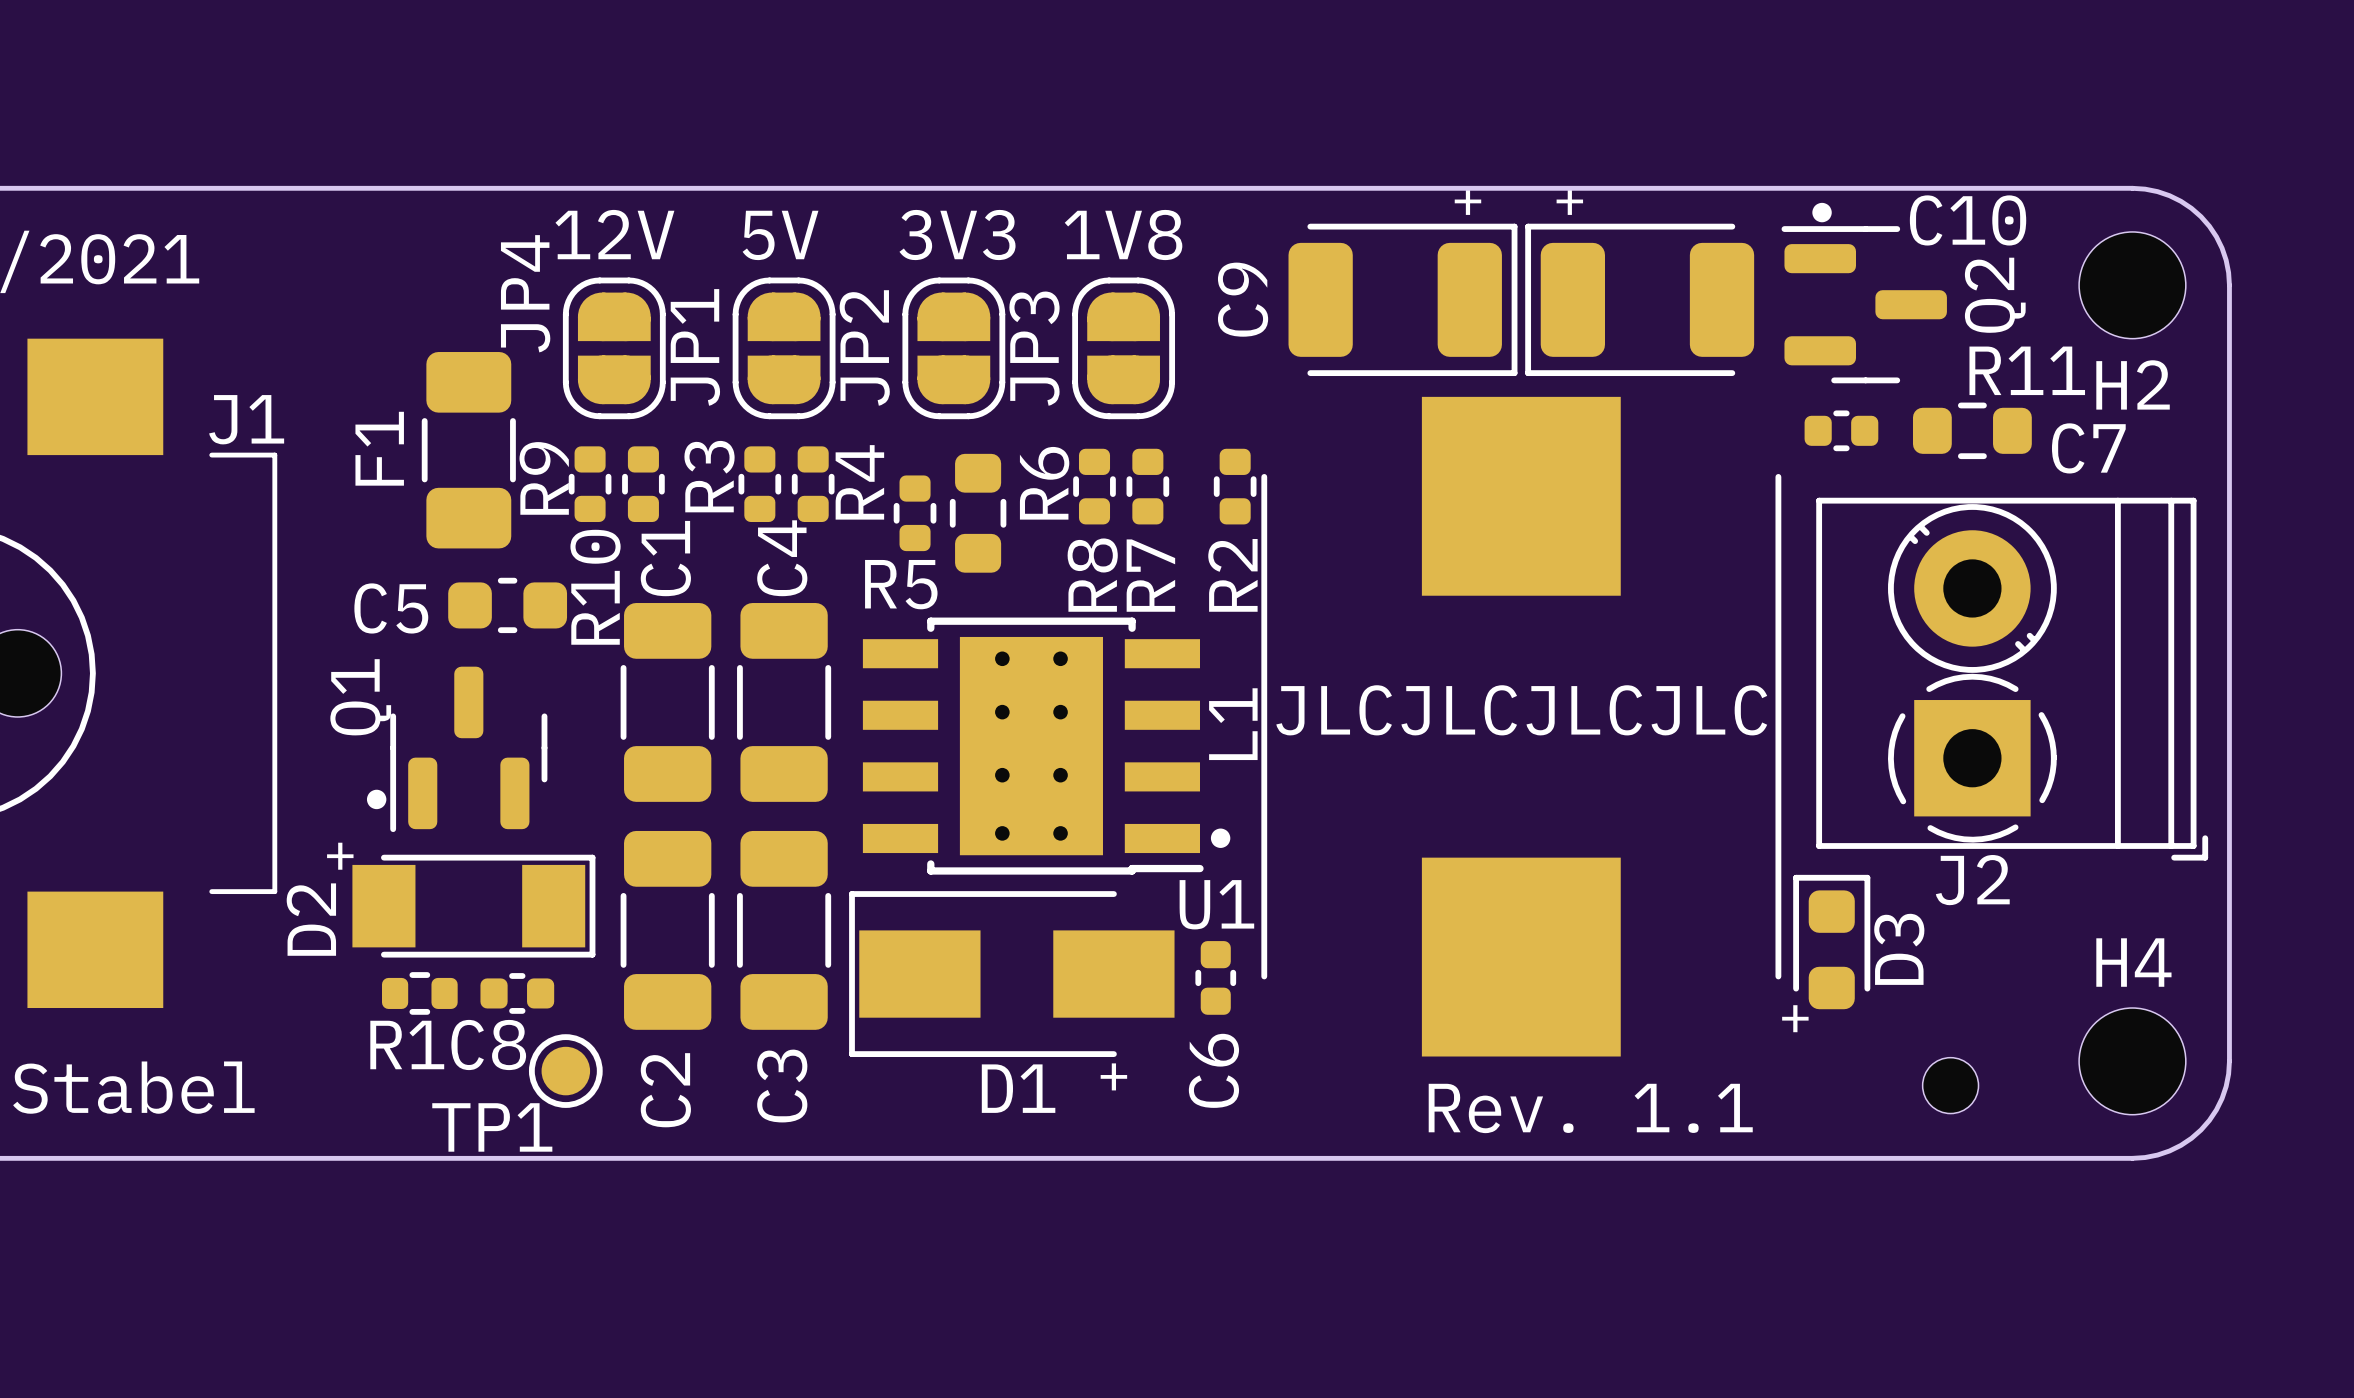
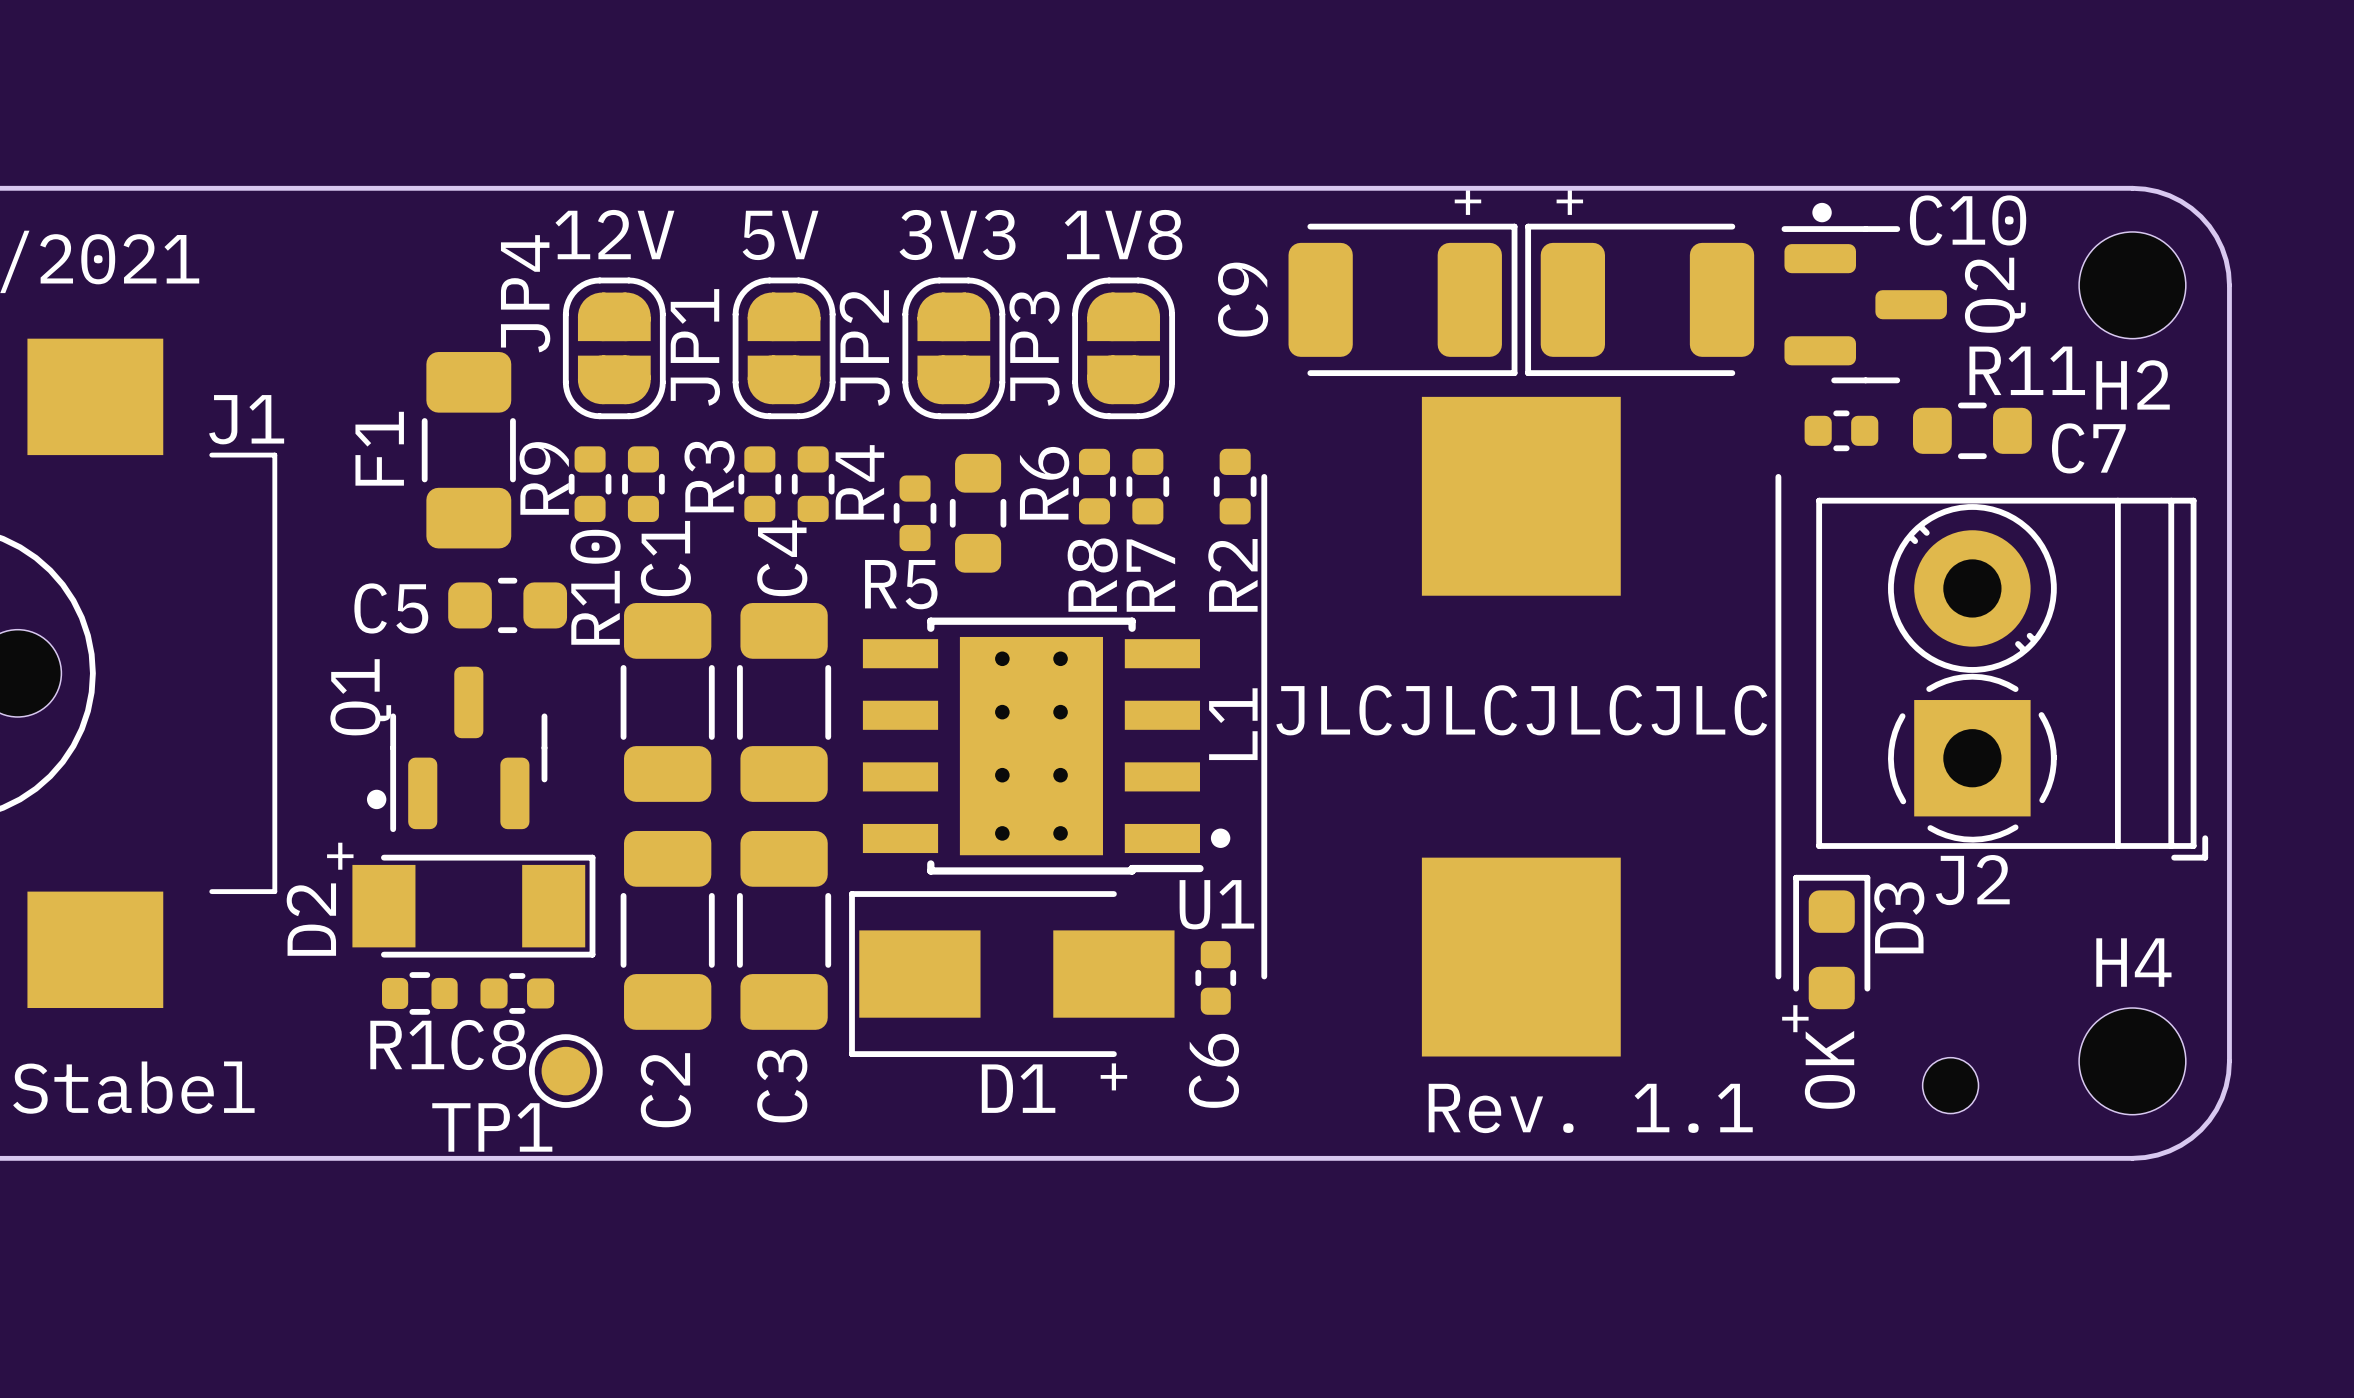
D3 name position: D3 (1899, 949) -> D3 (1899, 917)
text: none -> OK (1829, 1069)

